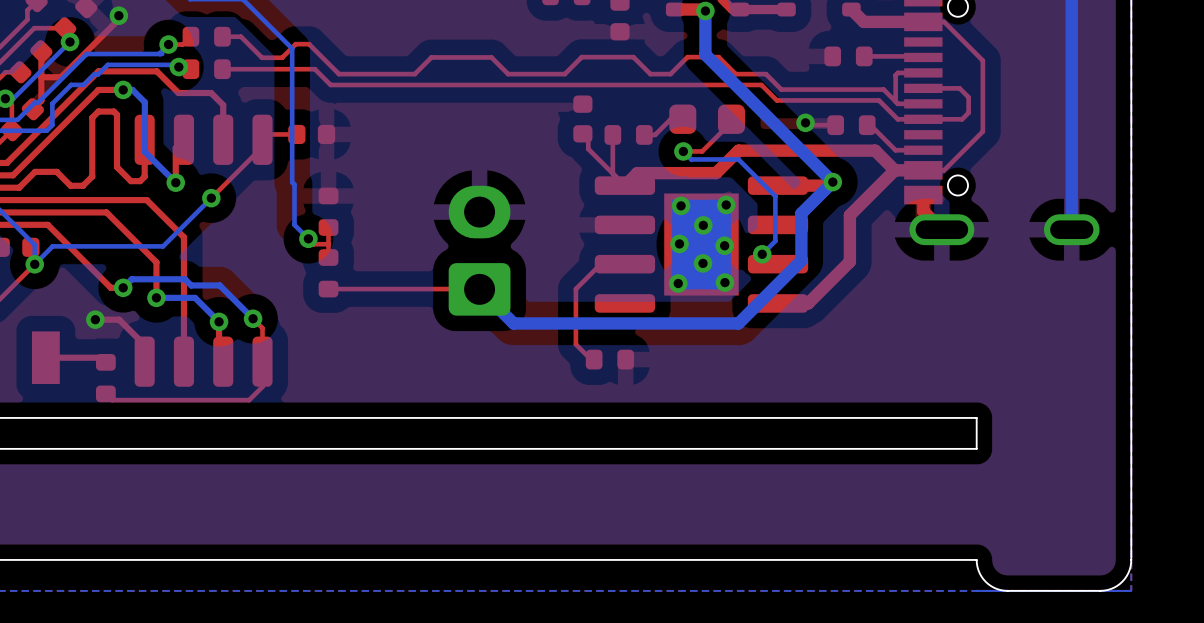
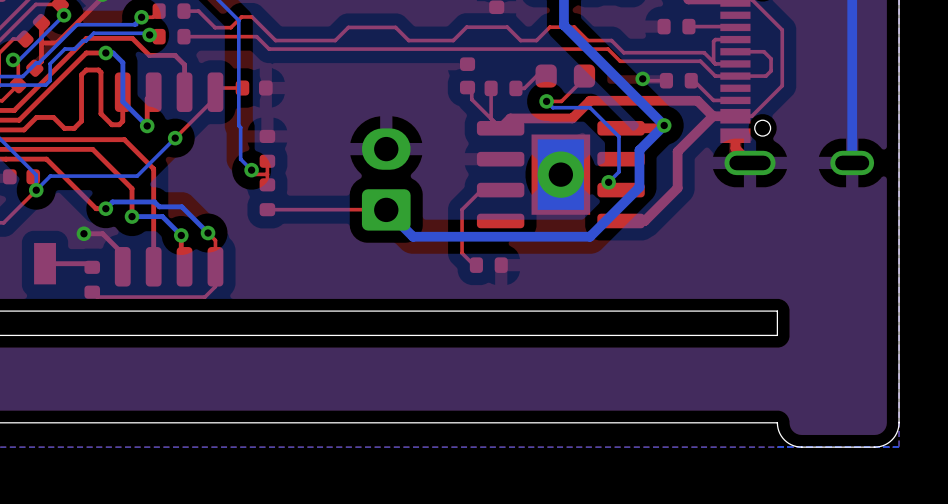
part footprint: [594, 176, 809, 313] -> [476, 120, 645, 229]
via: (726, 204) -> none
via: (681, 205) -> none
via: (703, 225) -> none
via: (679, 243) -> none
via: (724, 245) -> none
via: (703, 263) -> none
via: (724, 282) -> none
via: (678, 283) -> none

